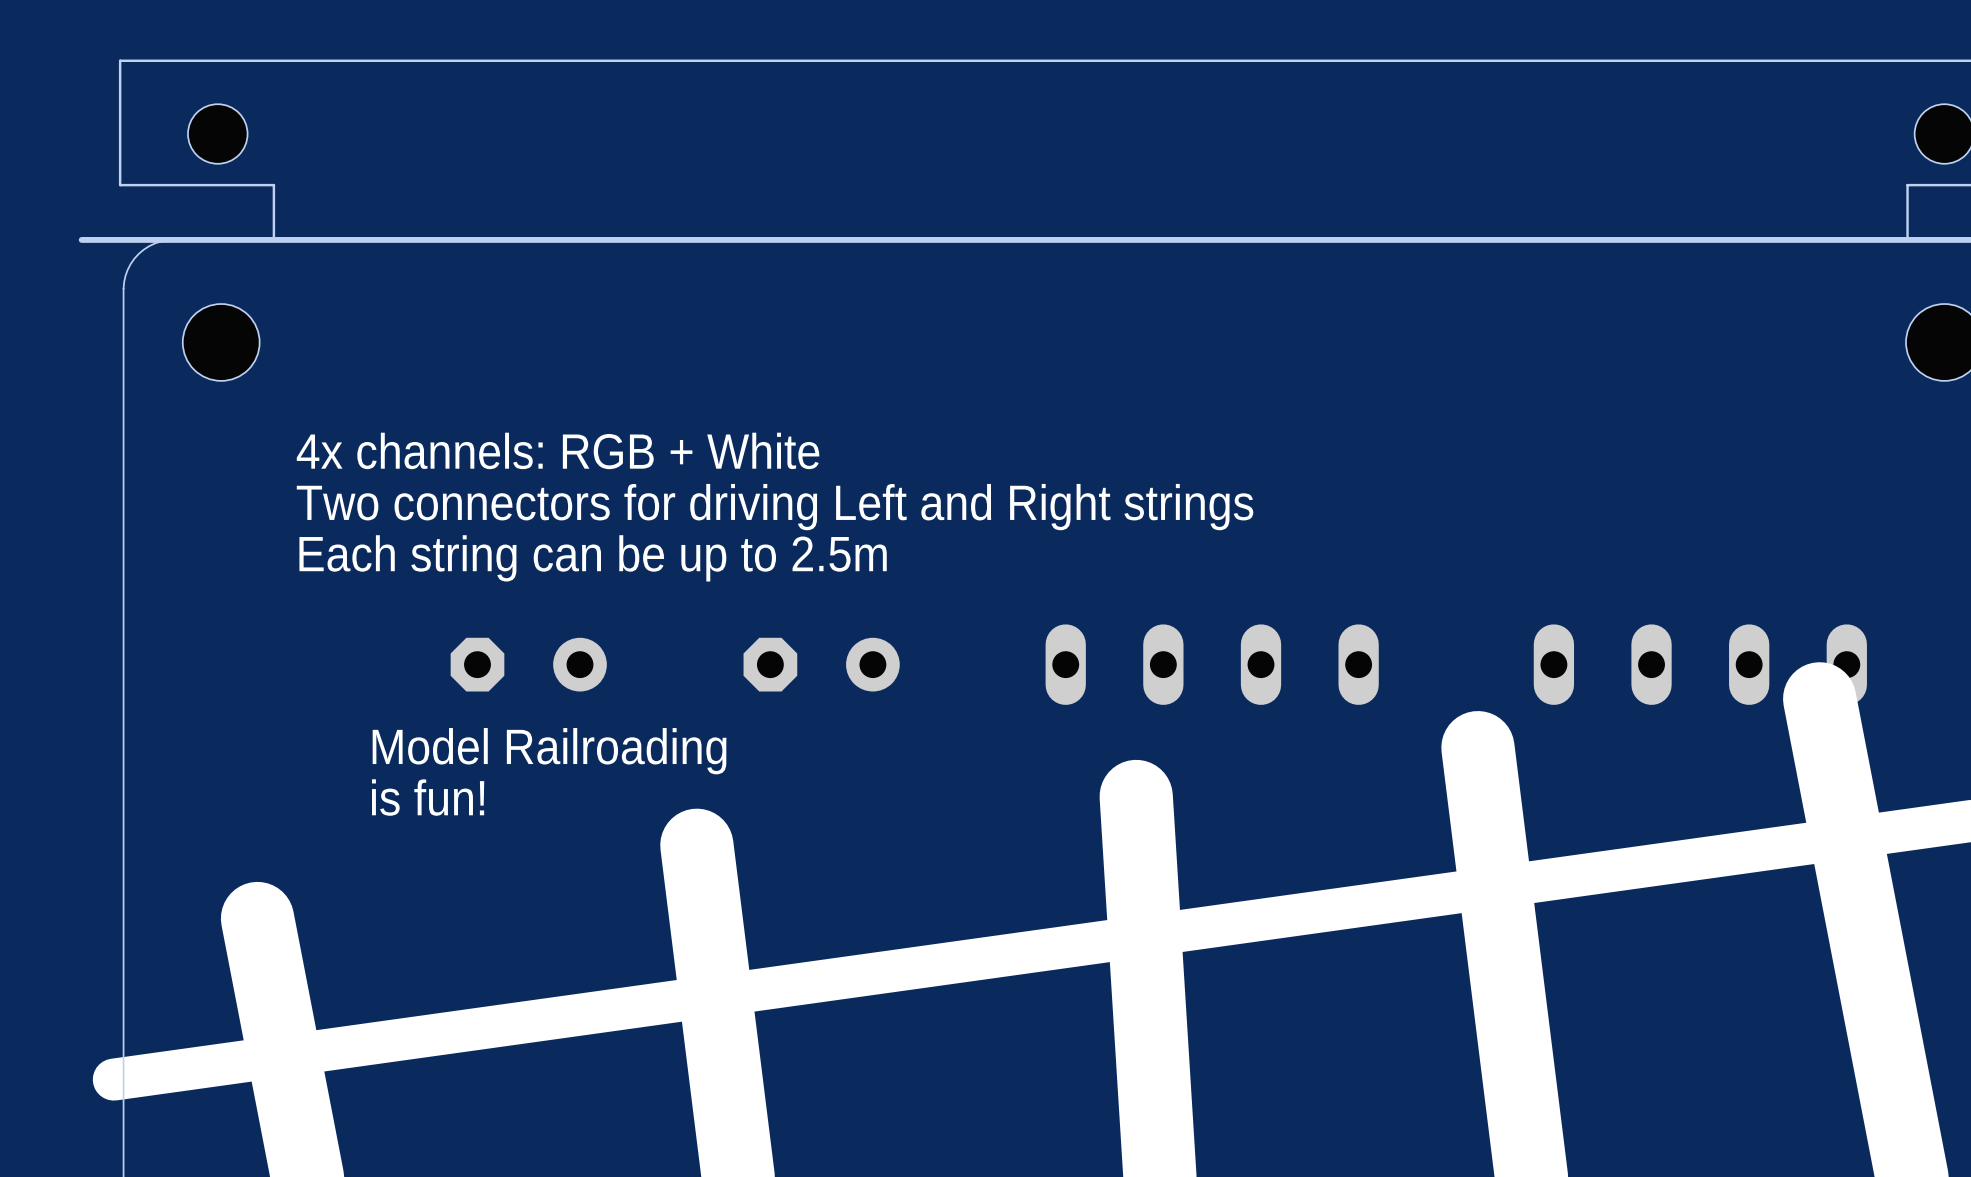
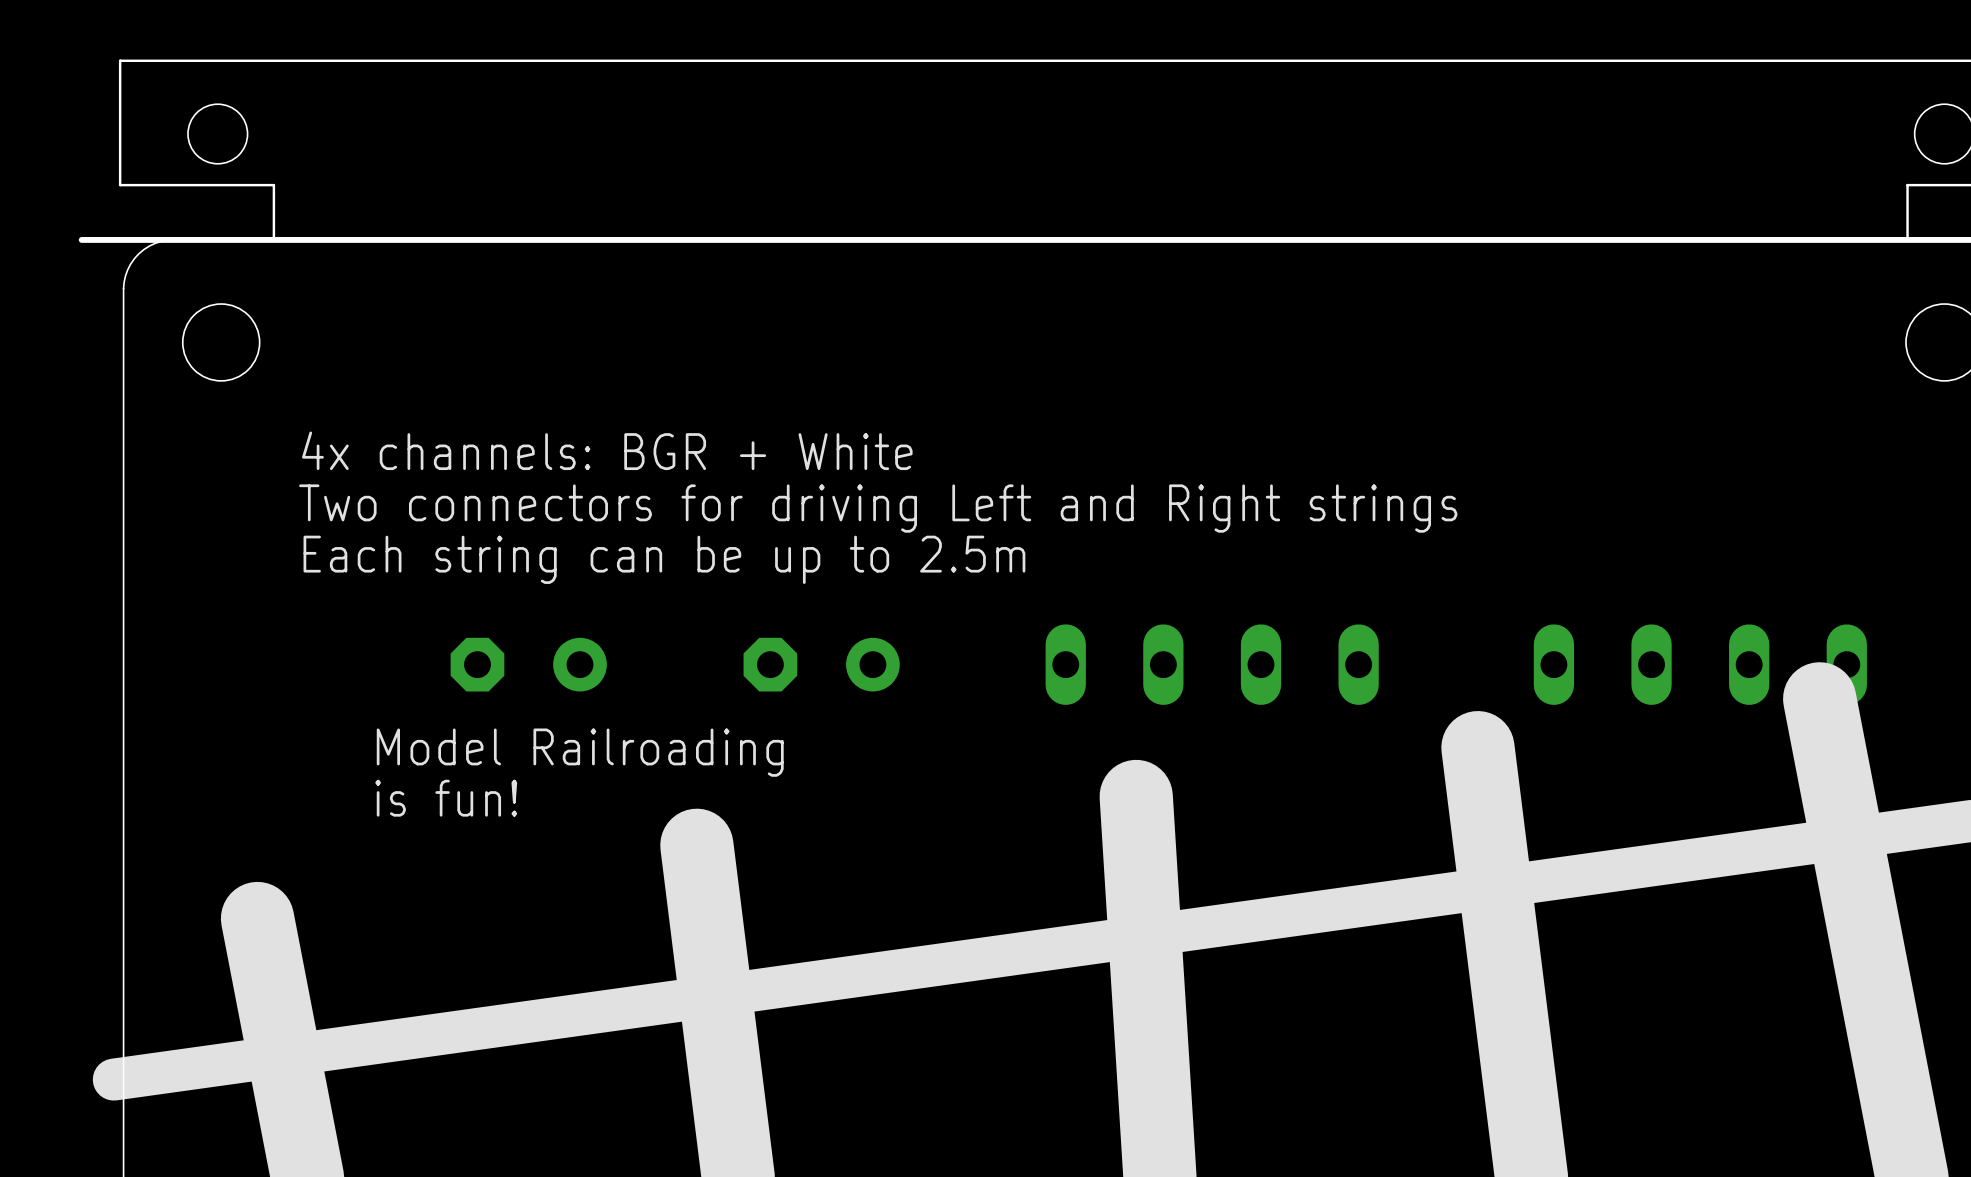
text: 4x channels: RGB + White (558, 450) -> 4x channels: BGR + White (607, 450)

